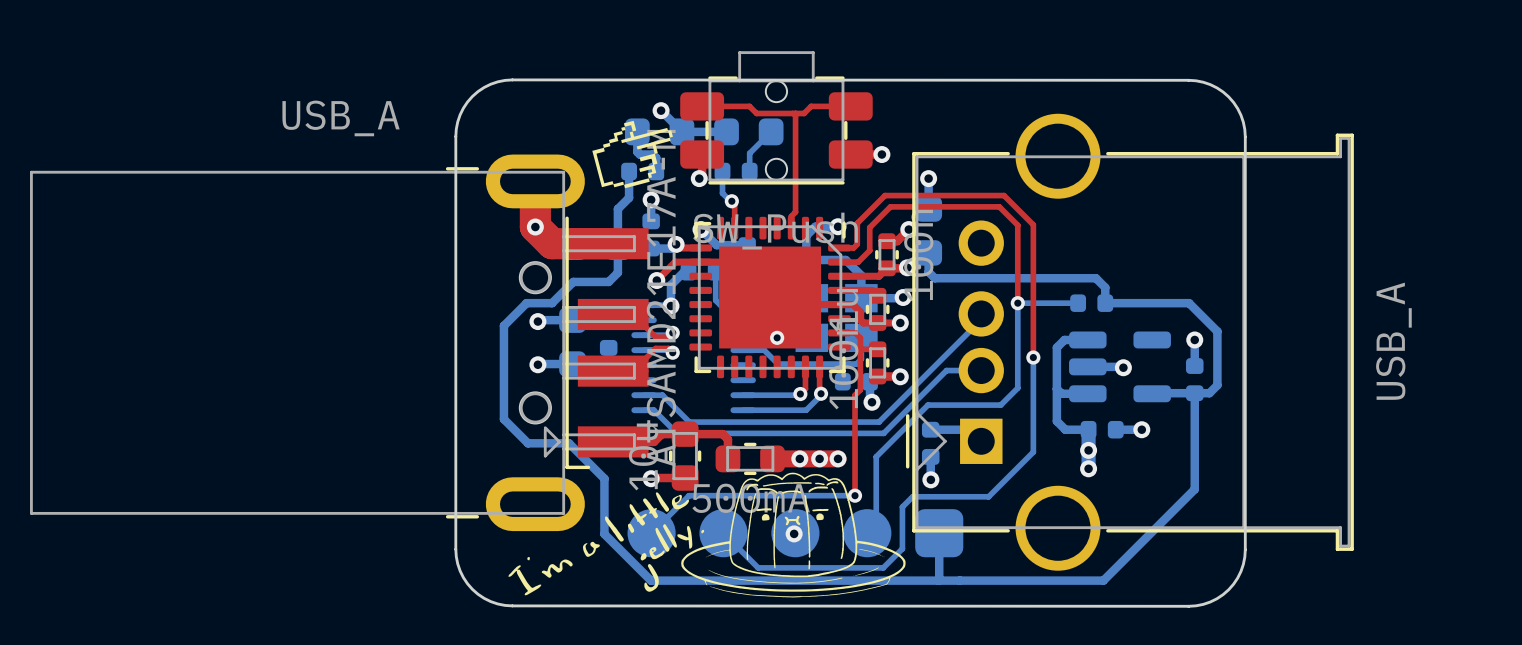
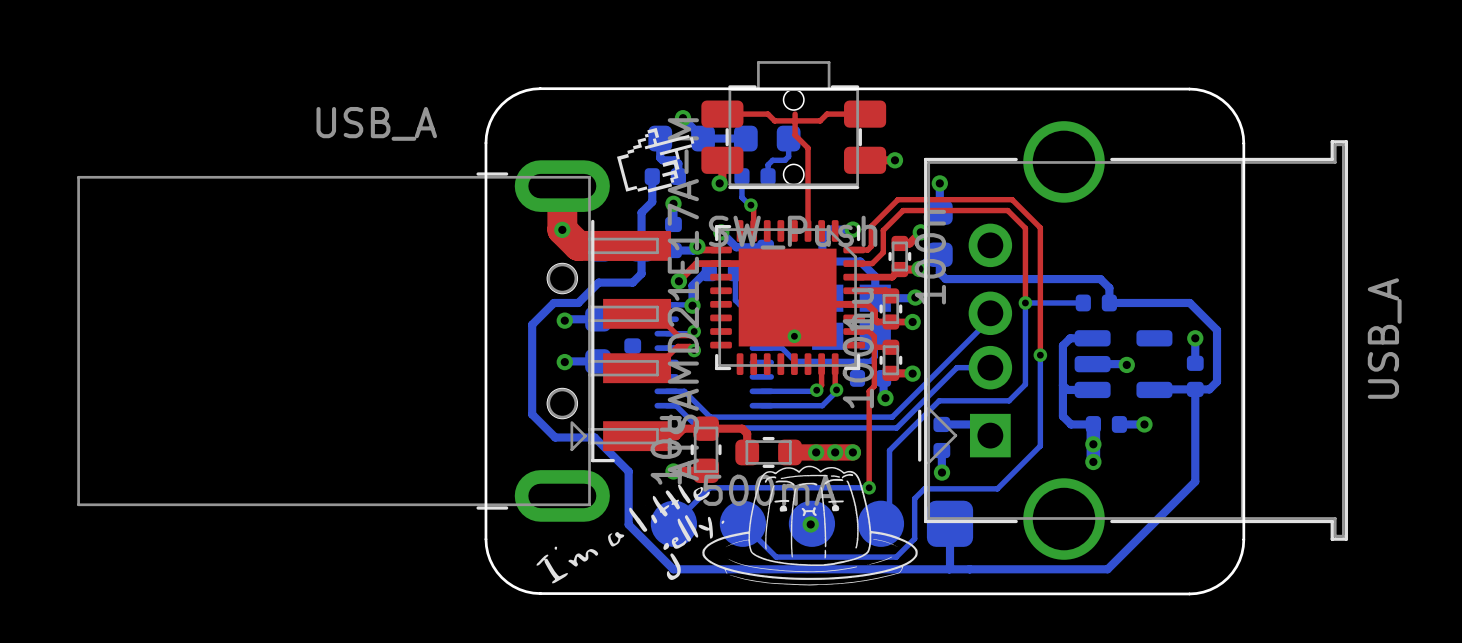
top track: (795, 113) (795, 212) (791, 216) -> (795, 114) (795, 135) (808, 148) (808, 219)
bottom track: (771, 131) (749, 153) (749, 159) -> (788, 138) (788, 156) (784, 160) (772, 160) (768, 164)

